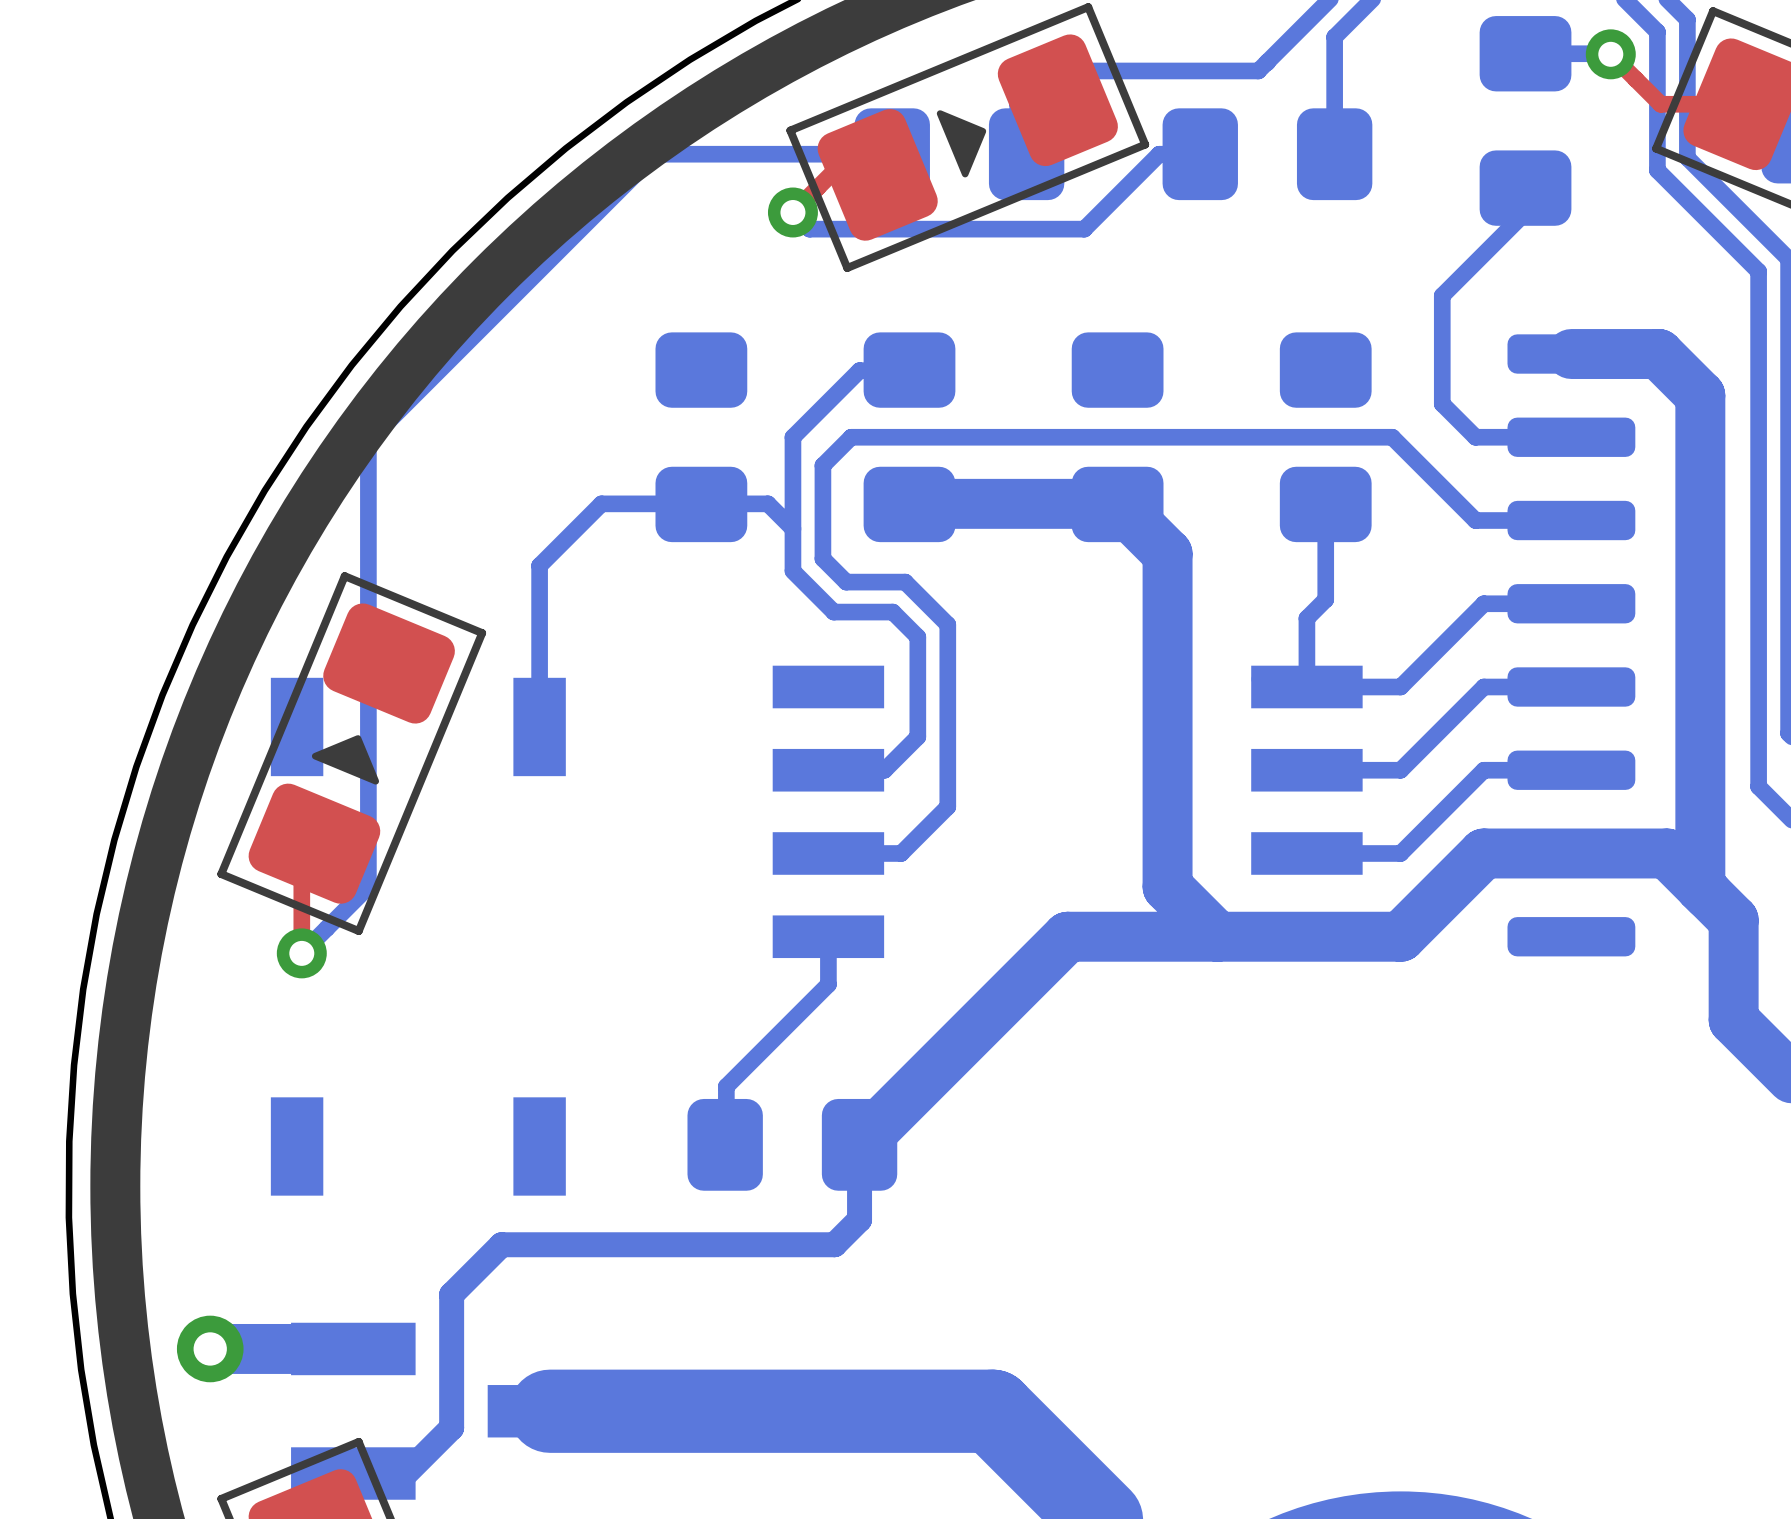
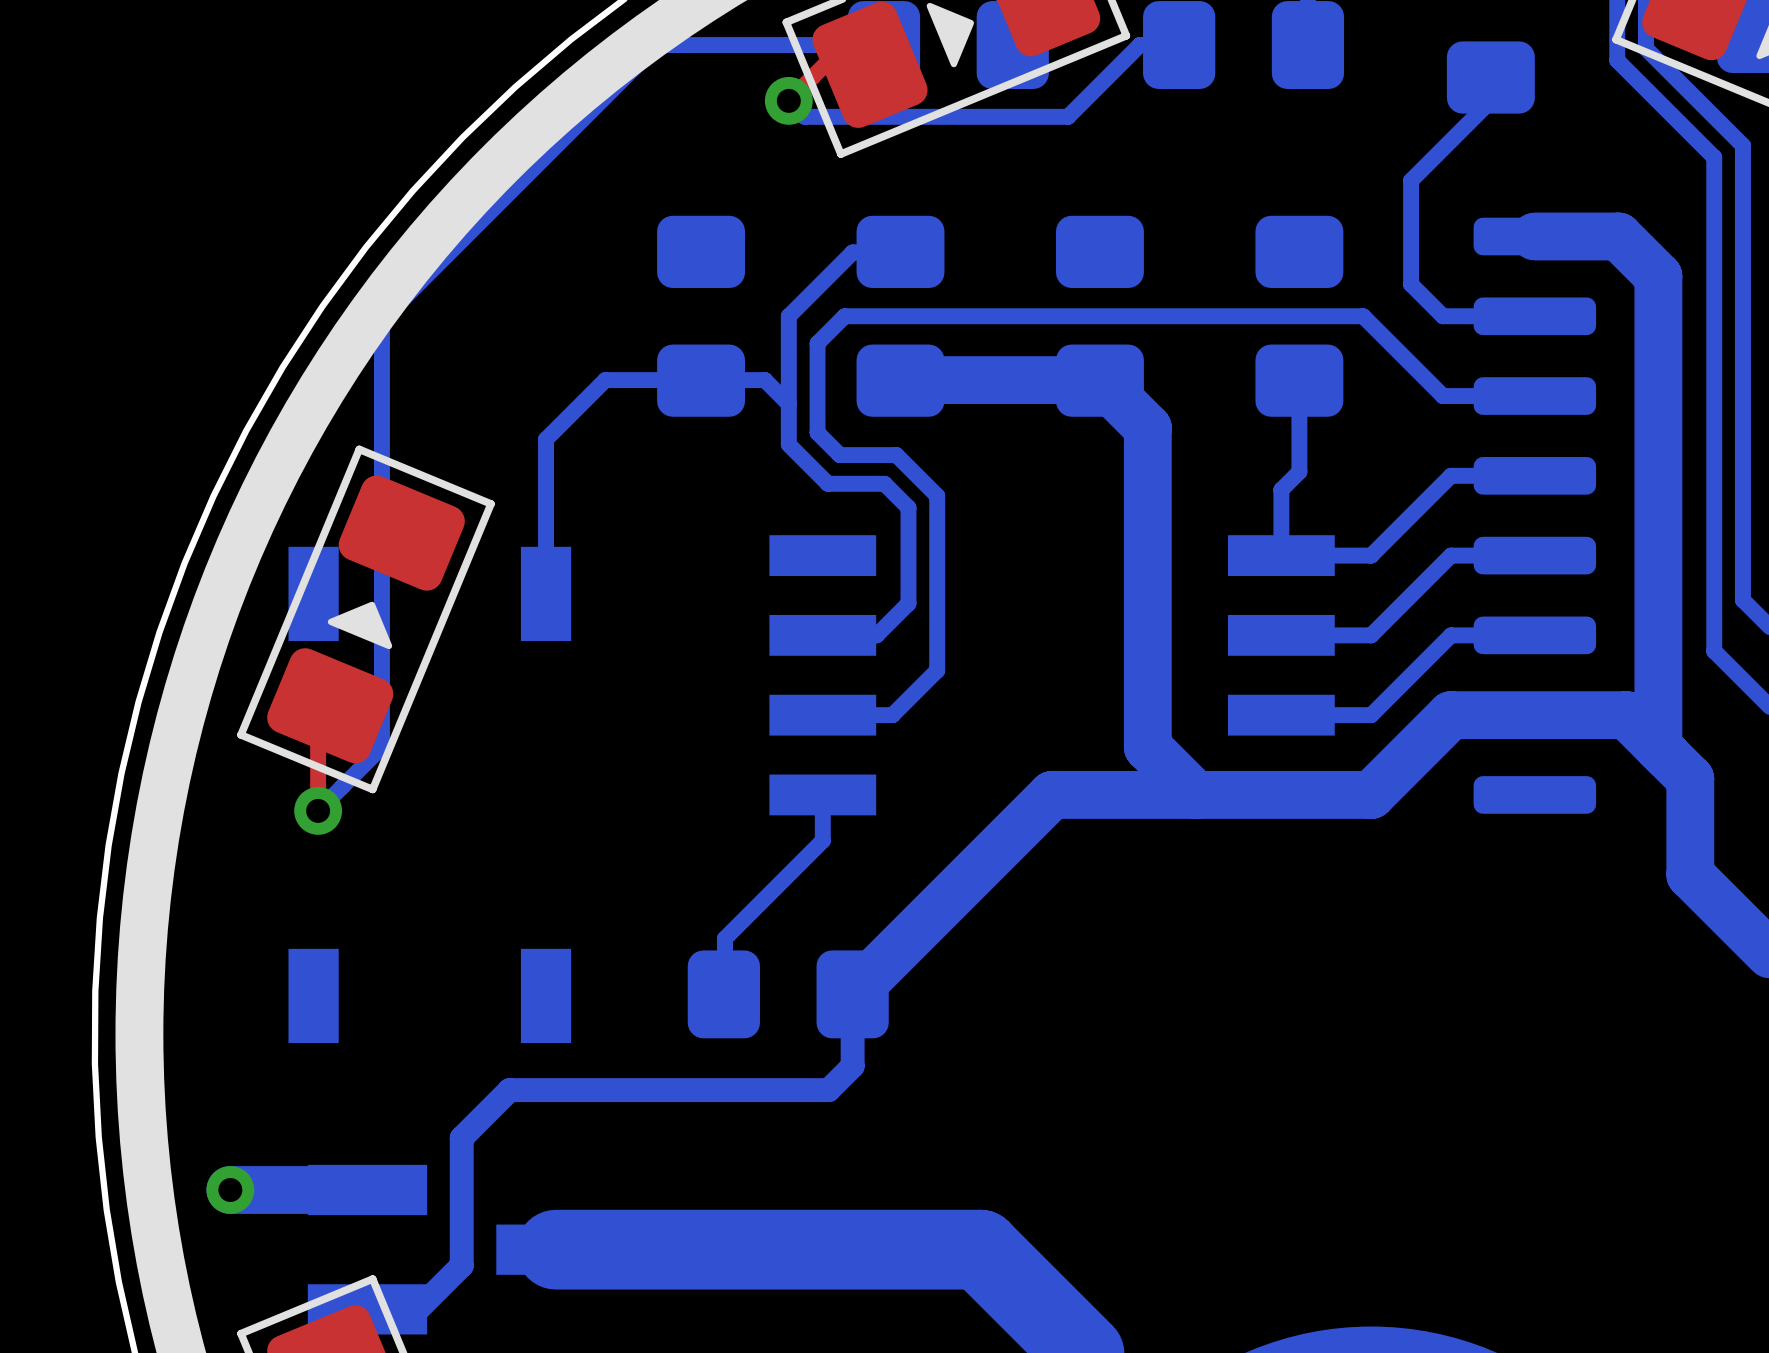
via size: [176, 1315, 244, 1383] -> [206, 1166, 255, 1214]

